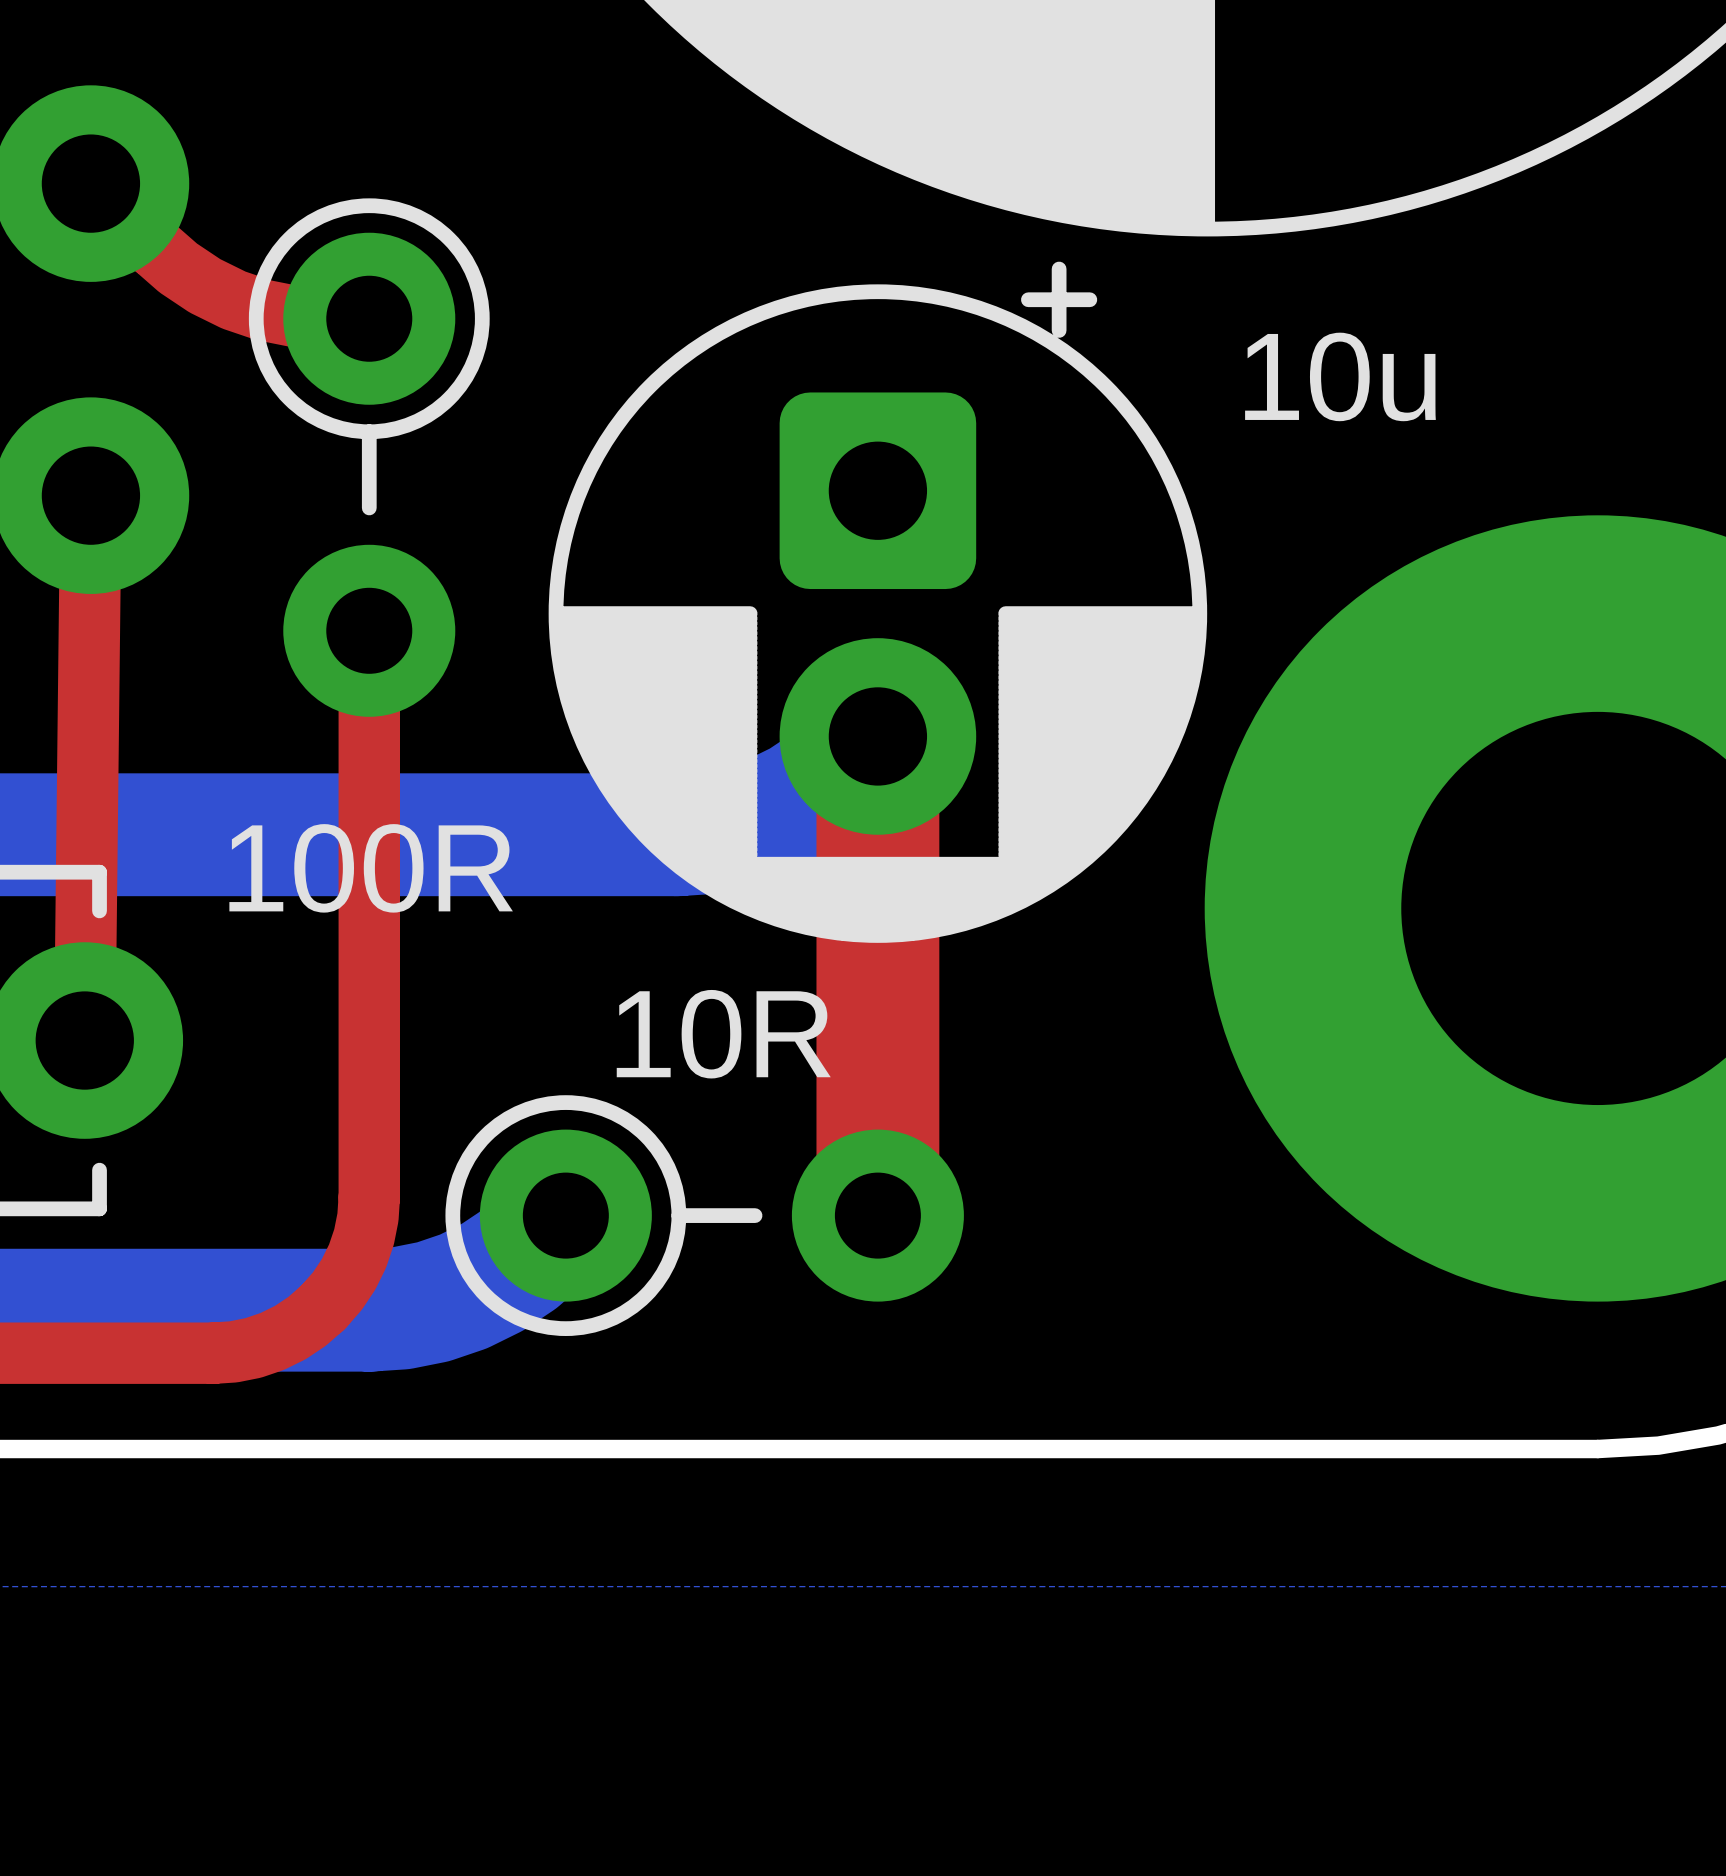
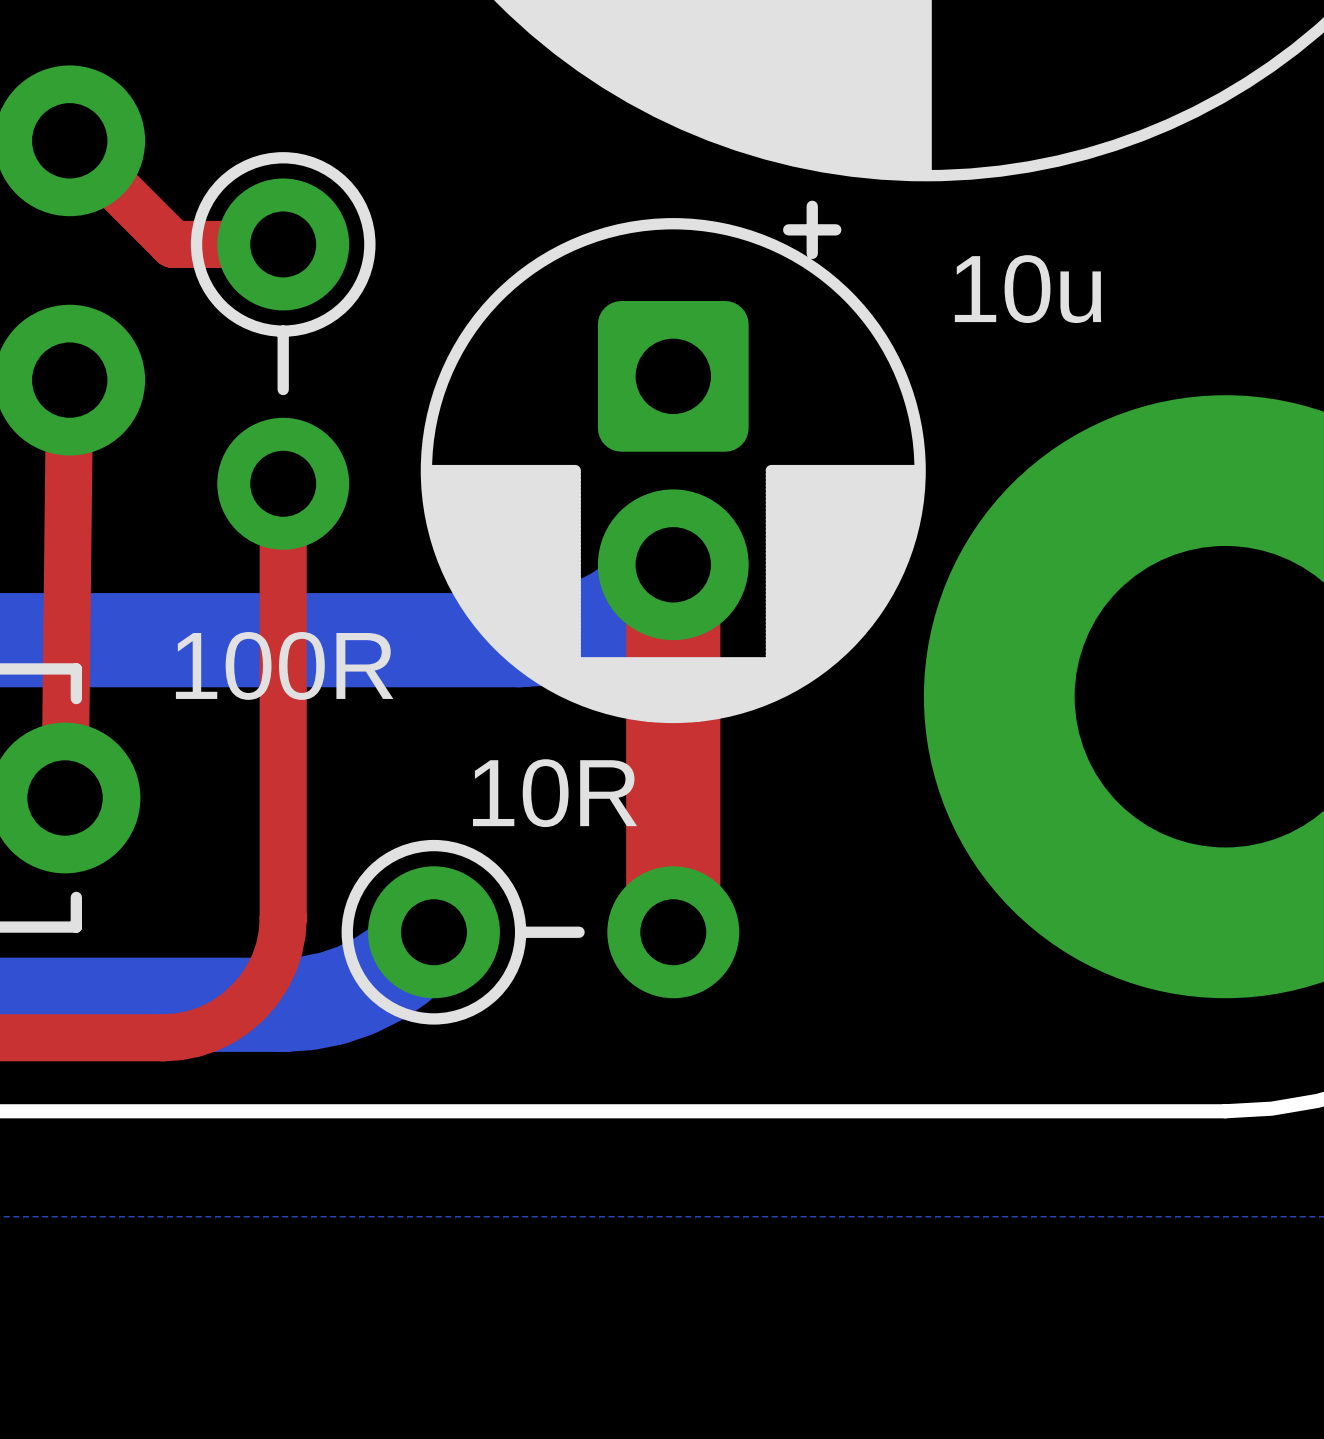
top track: (154, 246) (178, 267) (204, 285) (233, 300) (264, 310) (295, 316) (327, 318) -> (118, 189) (173, 244) (251, 244)

